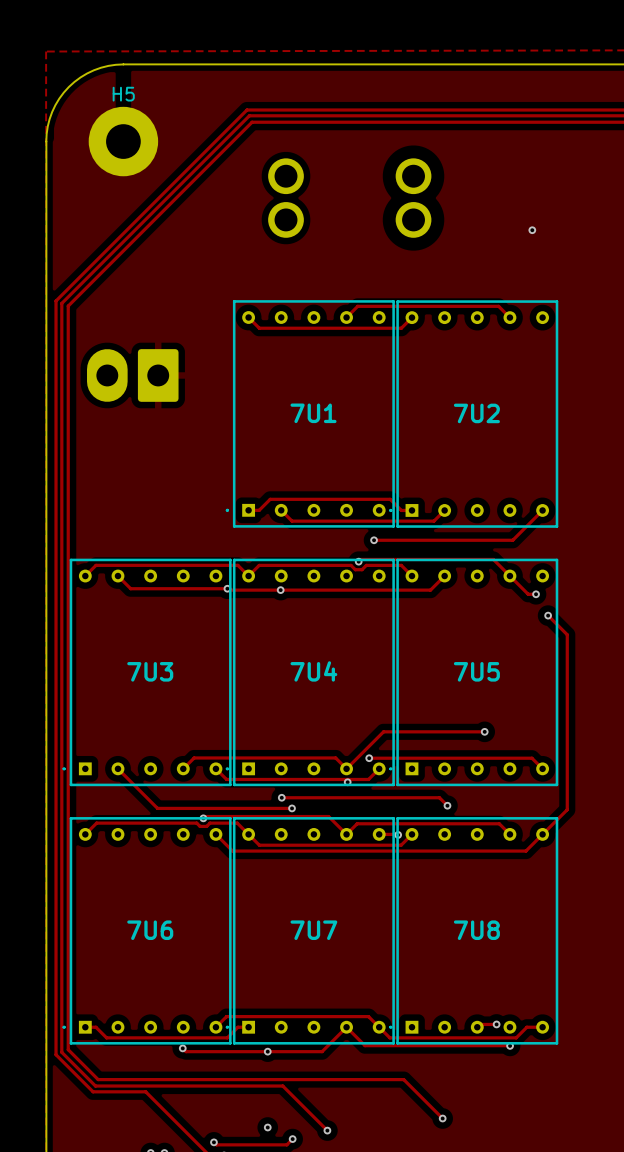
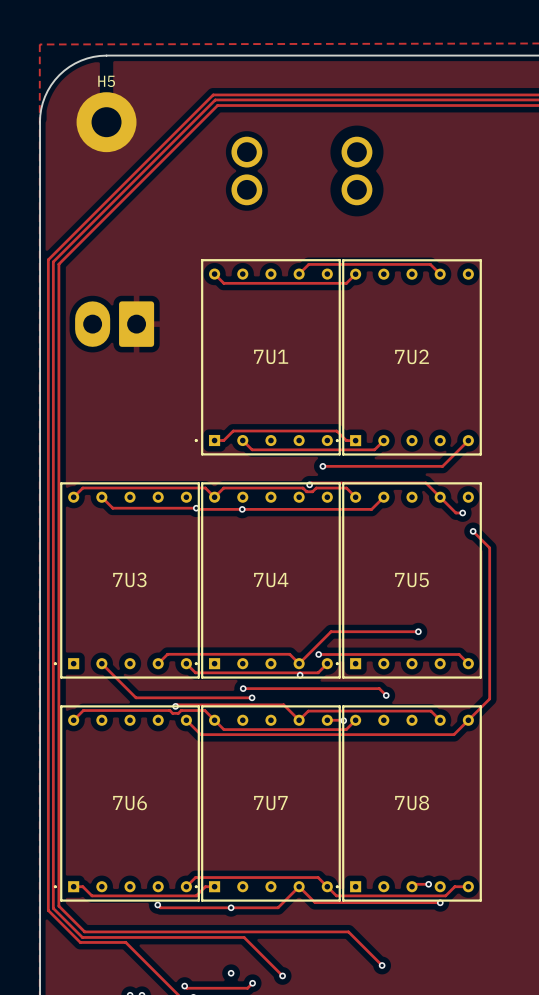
via: (532, 230) -> none

